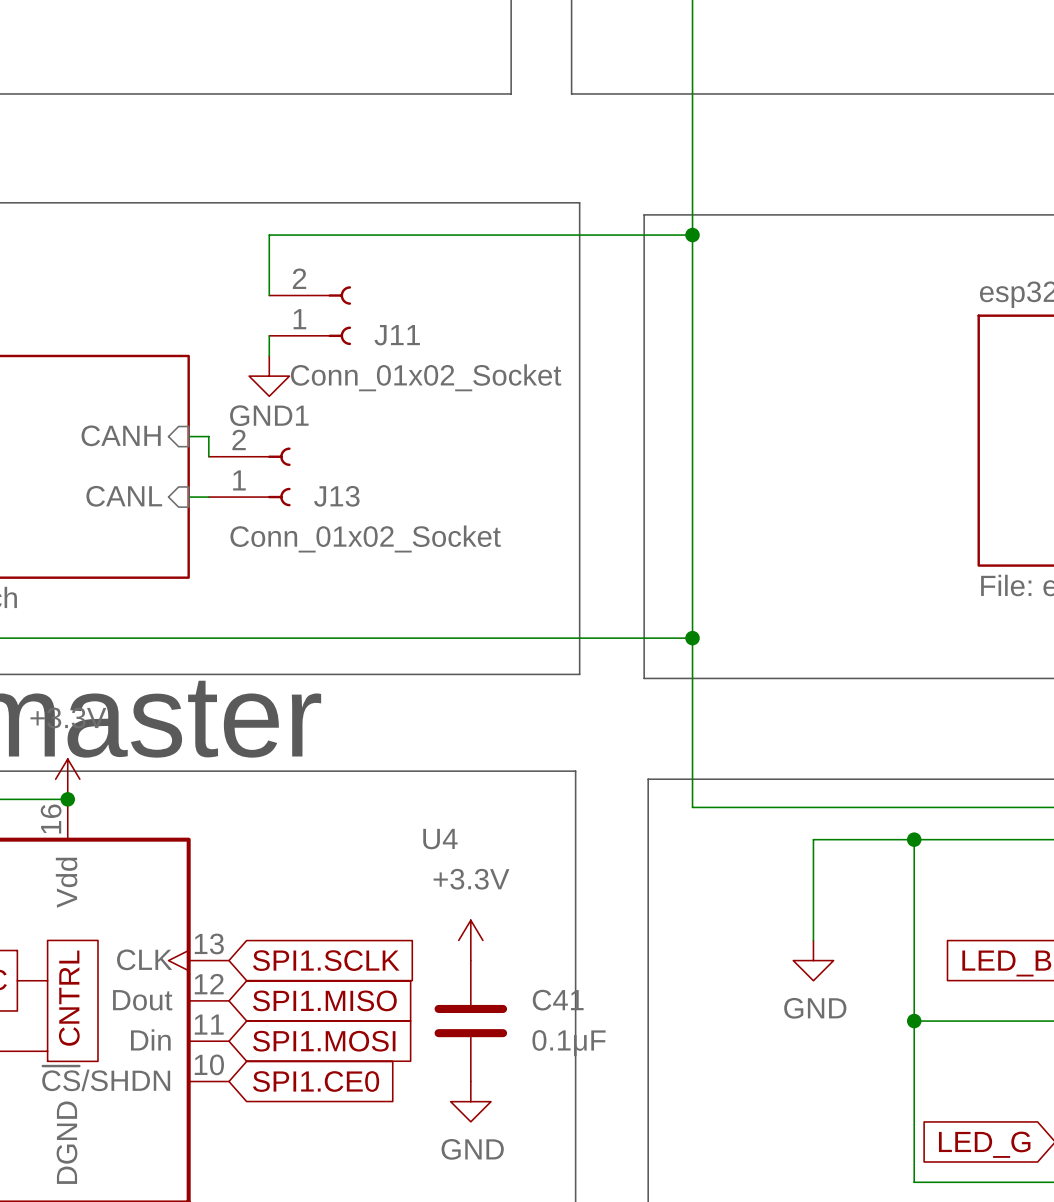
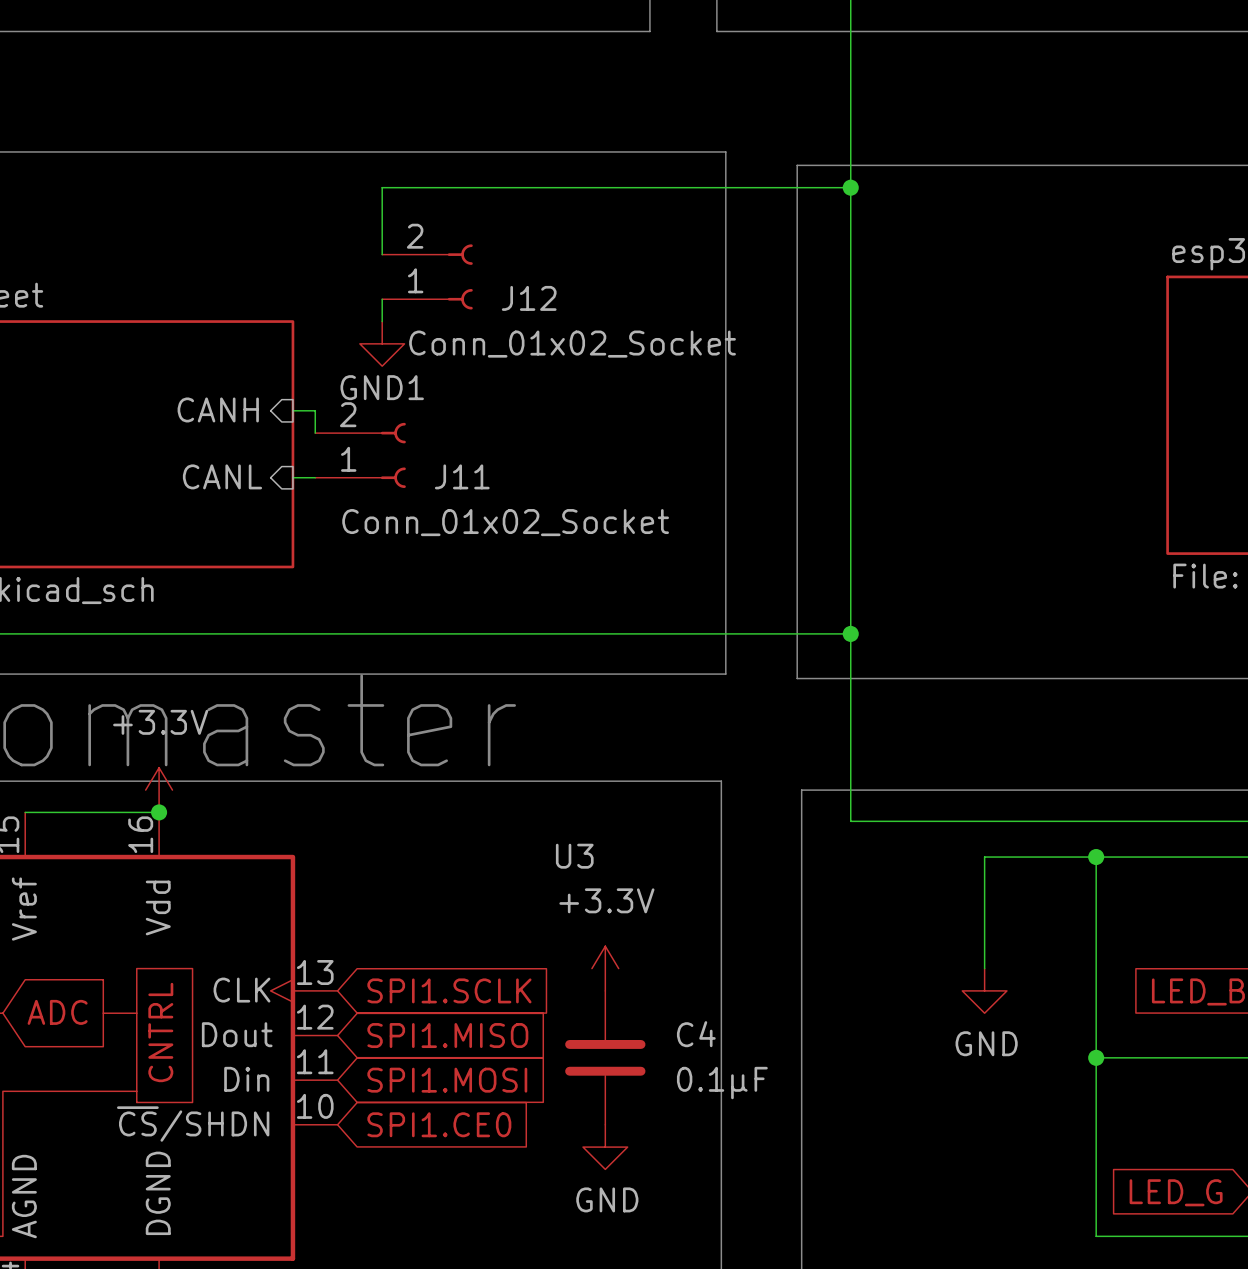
J11 name: J11 (397, 335) -> J12 (529, 298)
J13 name: J13 (336, 496) -> J11 (462, 476)
U4 name: U4 (440, 839) -> U3 (574, 856)
C41 name: C41 (558, 1000) -> C4 (696, 1034)

